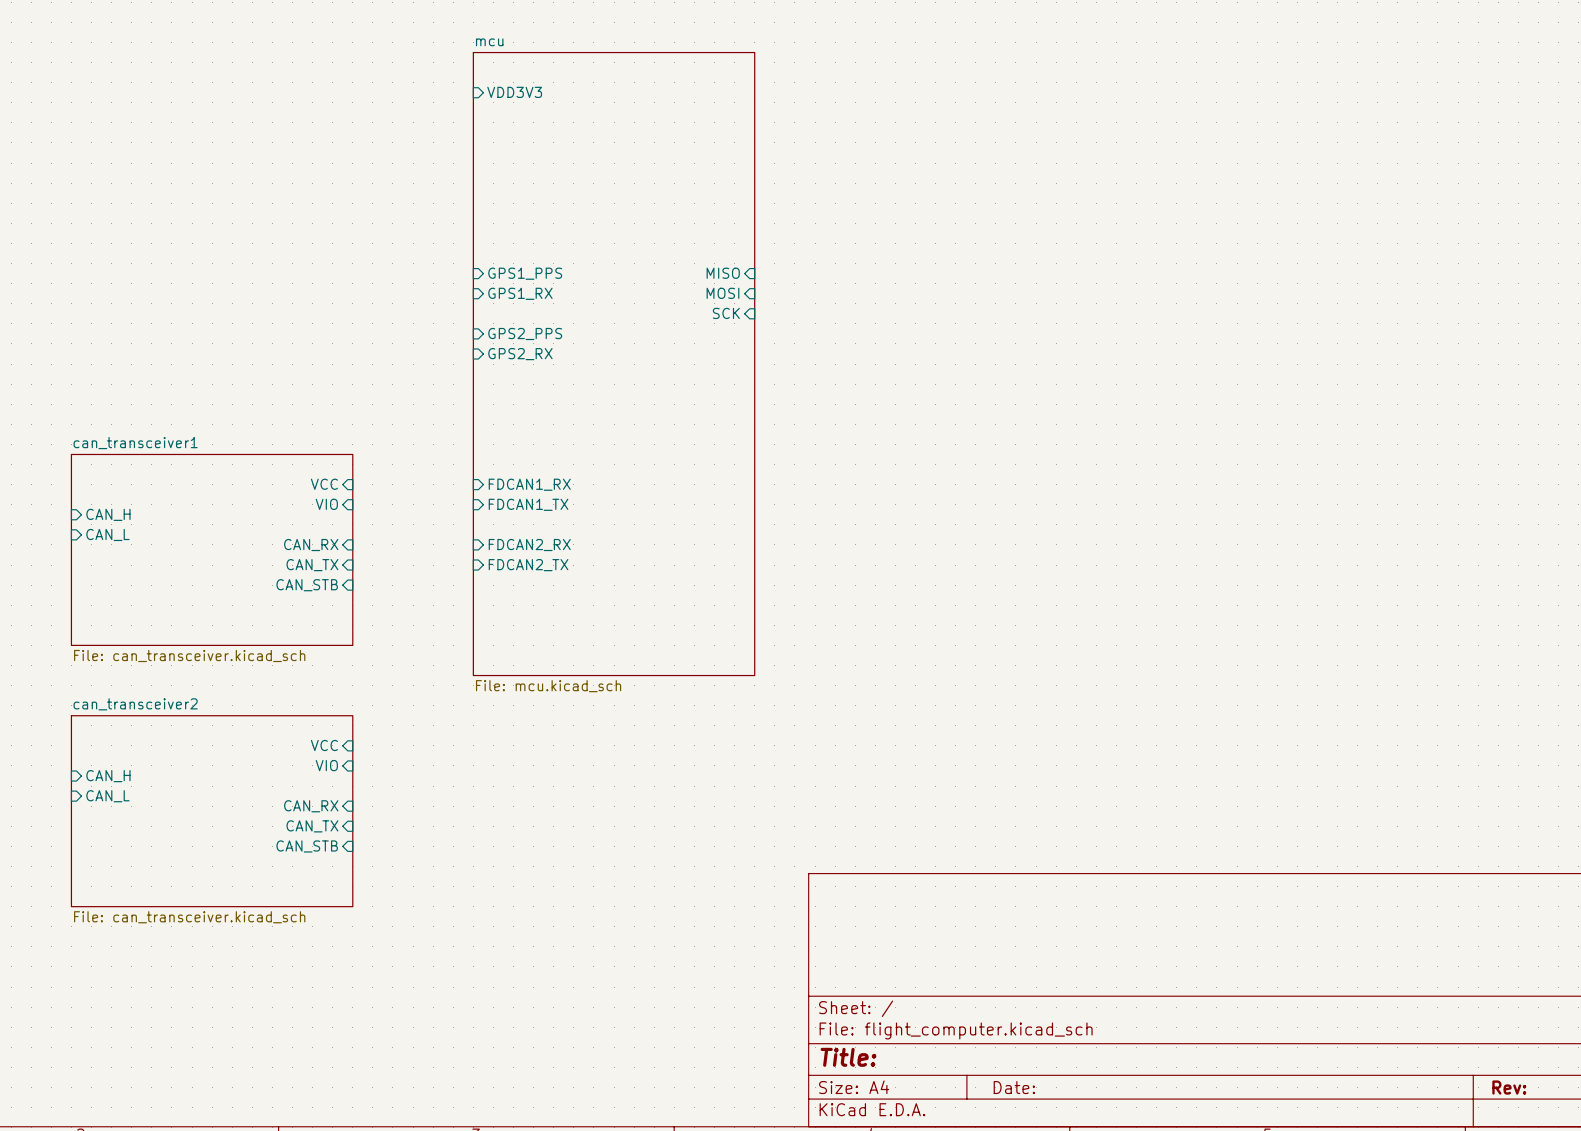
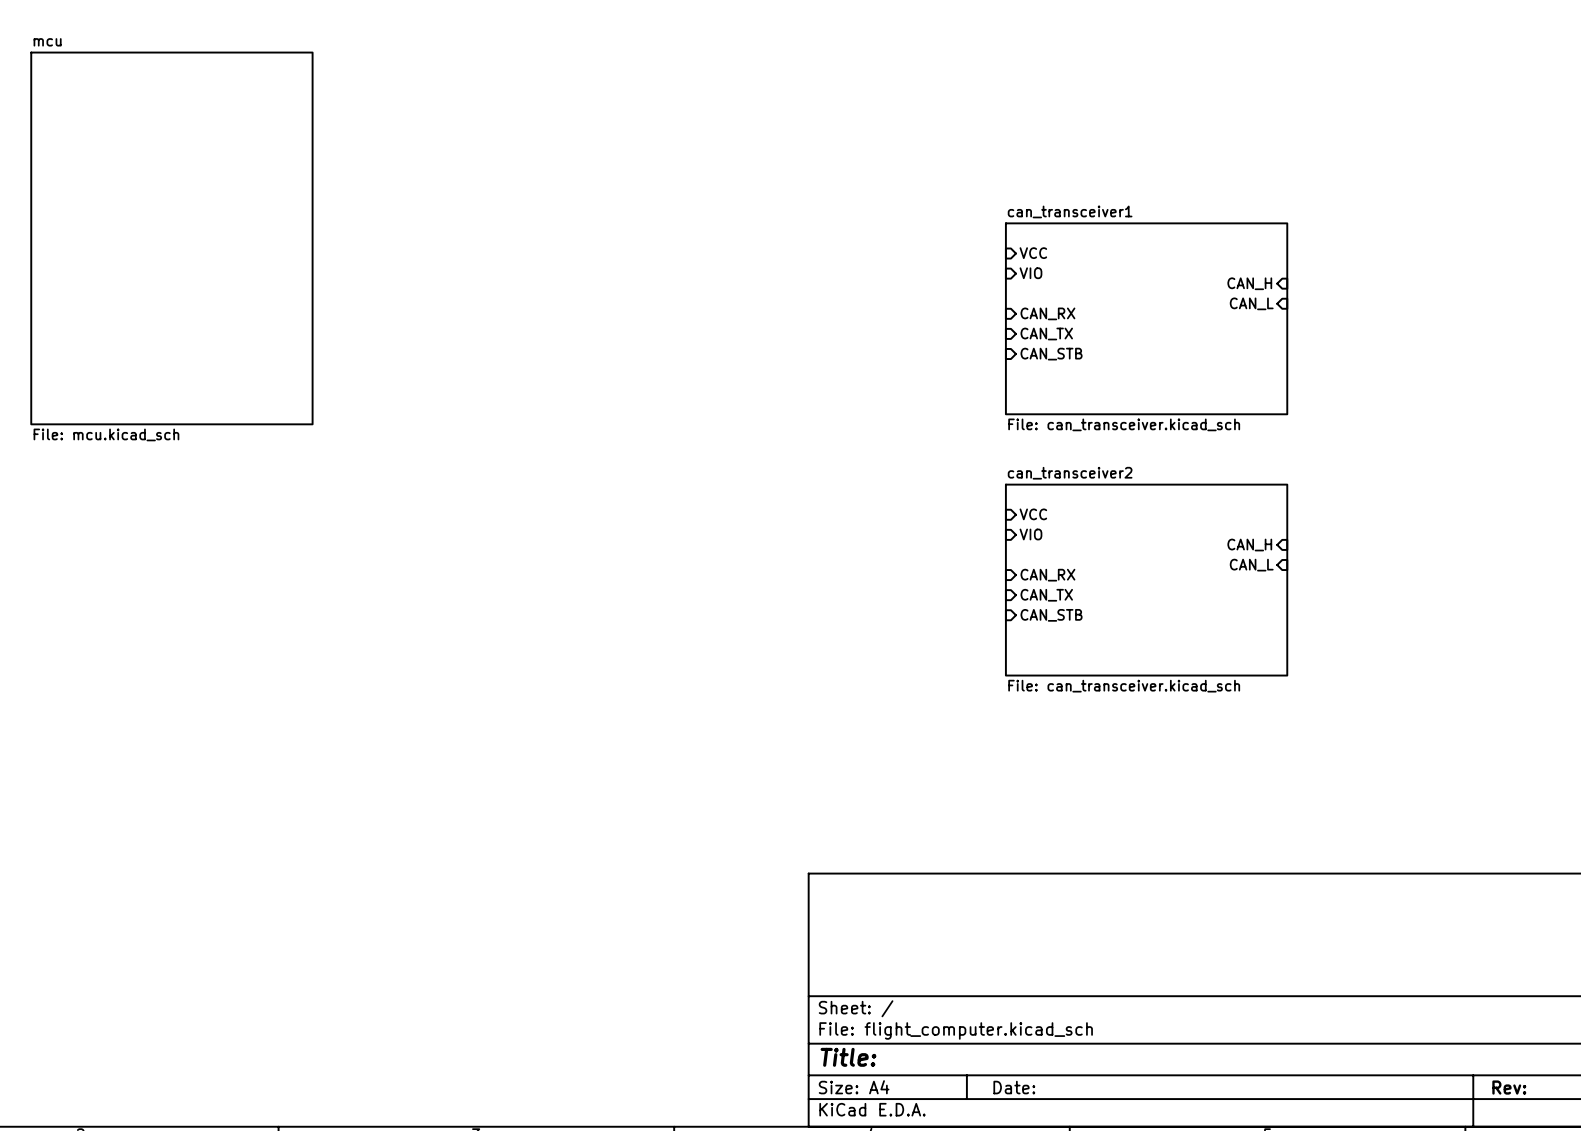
sheet pin: VDD3V3 (514, 92) -> none
sheet mcu: none -> File: mcu.kicad_sch (171, 238)
sheet pin: none -> VCC (1033, 253)
sheet pin: GPS1_PPS (525, 273) -> none
sheet pin: MISO (723, 273) -> none
sheet pin: none -> VIO (1030, 273)
sheet pin: none -> CAN_H (1249, 283)
sheet pin: GPS1_RX (520, 293) -> none
sheet pin: MOSI (722, 293) -> none
sheet pin: none -> CAN_L (1251, 303)
sheet pin: SCK (726, 313) -> none
sheet pin: none -> CAN_RX (1047, 313)
sheet pin: GPS2_PPS (525, 334) -> none
sheet pin: none -> CAN_TX (1046, 334)
sheet pin: GPS2_RX (520, 354) -> none
sheet pin: none -> CAN_STB (1051, 354)
sheet mcu: File: mcu.kicad_sch (614, 364) -> none
sheet pin: VCC (324, 484) -> none
sheet pin: FDCAN1_RX (529, 484) -> none
sheet pin: VIO (326, 504) -> none
sheet pin: FDCAN1_TX (528, 504) -> none
sheet pin: CAN_H (108, 514) -> none
sheet pin: none -> VCC (1033, 514)
sheet pin: CAN_L (107, 534) -> none
sheet pin: none -> VIO (1030, 534)
sheet pin: CAN_RX (311, 545) -> none
sheet pin: FDCAN2_RX (529, 545) -> none
sheet pin: none -> CAN_H (1249, 545)
sheet can_transceiver1 position: (212, 549) -> (1146, 318)
sheet pin: CAN_TX (312, 565) -> none
sheet pin: FDCAN2_TX (528, 565) -> none
sheet pin: none -> CAN_L (1251, 565)
sheet pin: none -> CAN_RX (1047, 575)
sheet pin: CAN_STB (307, 585) -> none
sheet pin: none -> CAN_TX (1046, 595)
sheet pin: none -> CAN_STB (1051, 615)
sheet pin: VCC (324, 745) -> none
sheet pin: VIO (326, 765) -> none
sheet pin: CAN_H (108, 776) -> none
sheet pin: CAN_L (107, 796) -> none
sheet pin: CAN_RX (311, 806) -> none
sheet can_transceiver2 position: (212, 811) -> (1146, 580)
sheet pin: CAN_TX (312, 826) -> none
sheet pin: CAN_STB (307, 846) -> none

